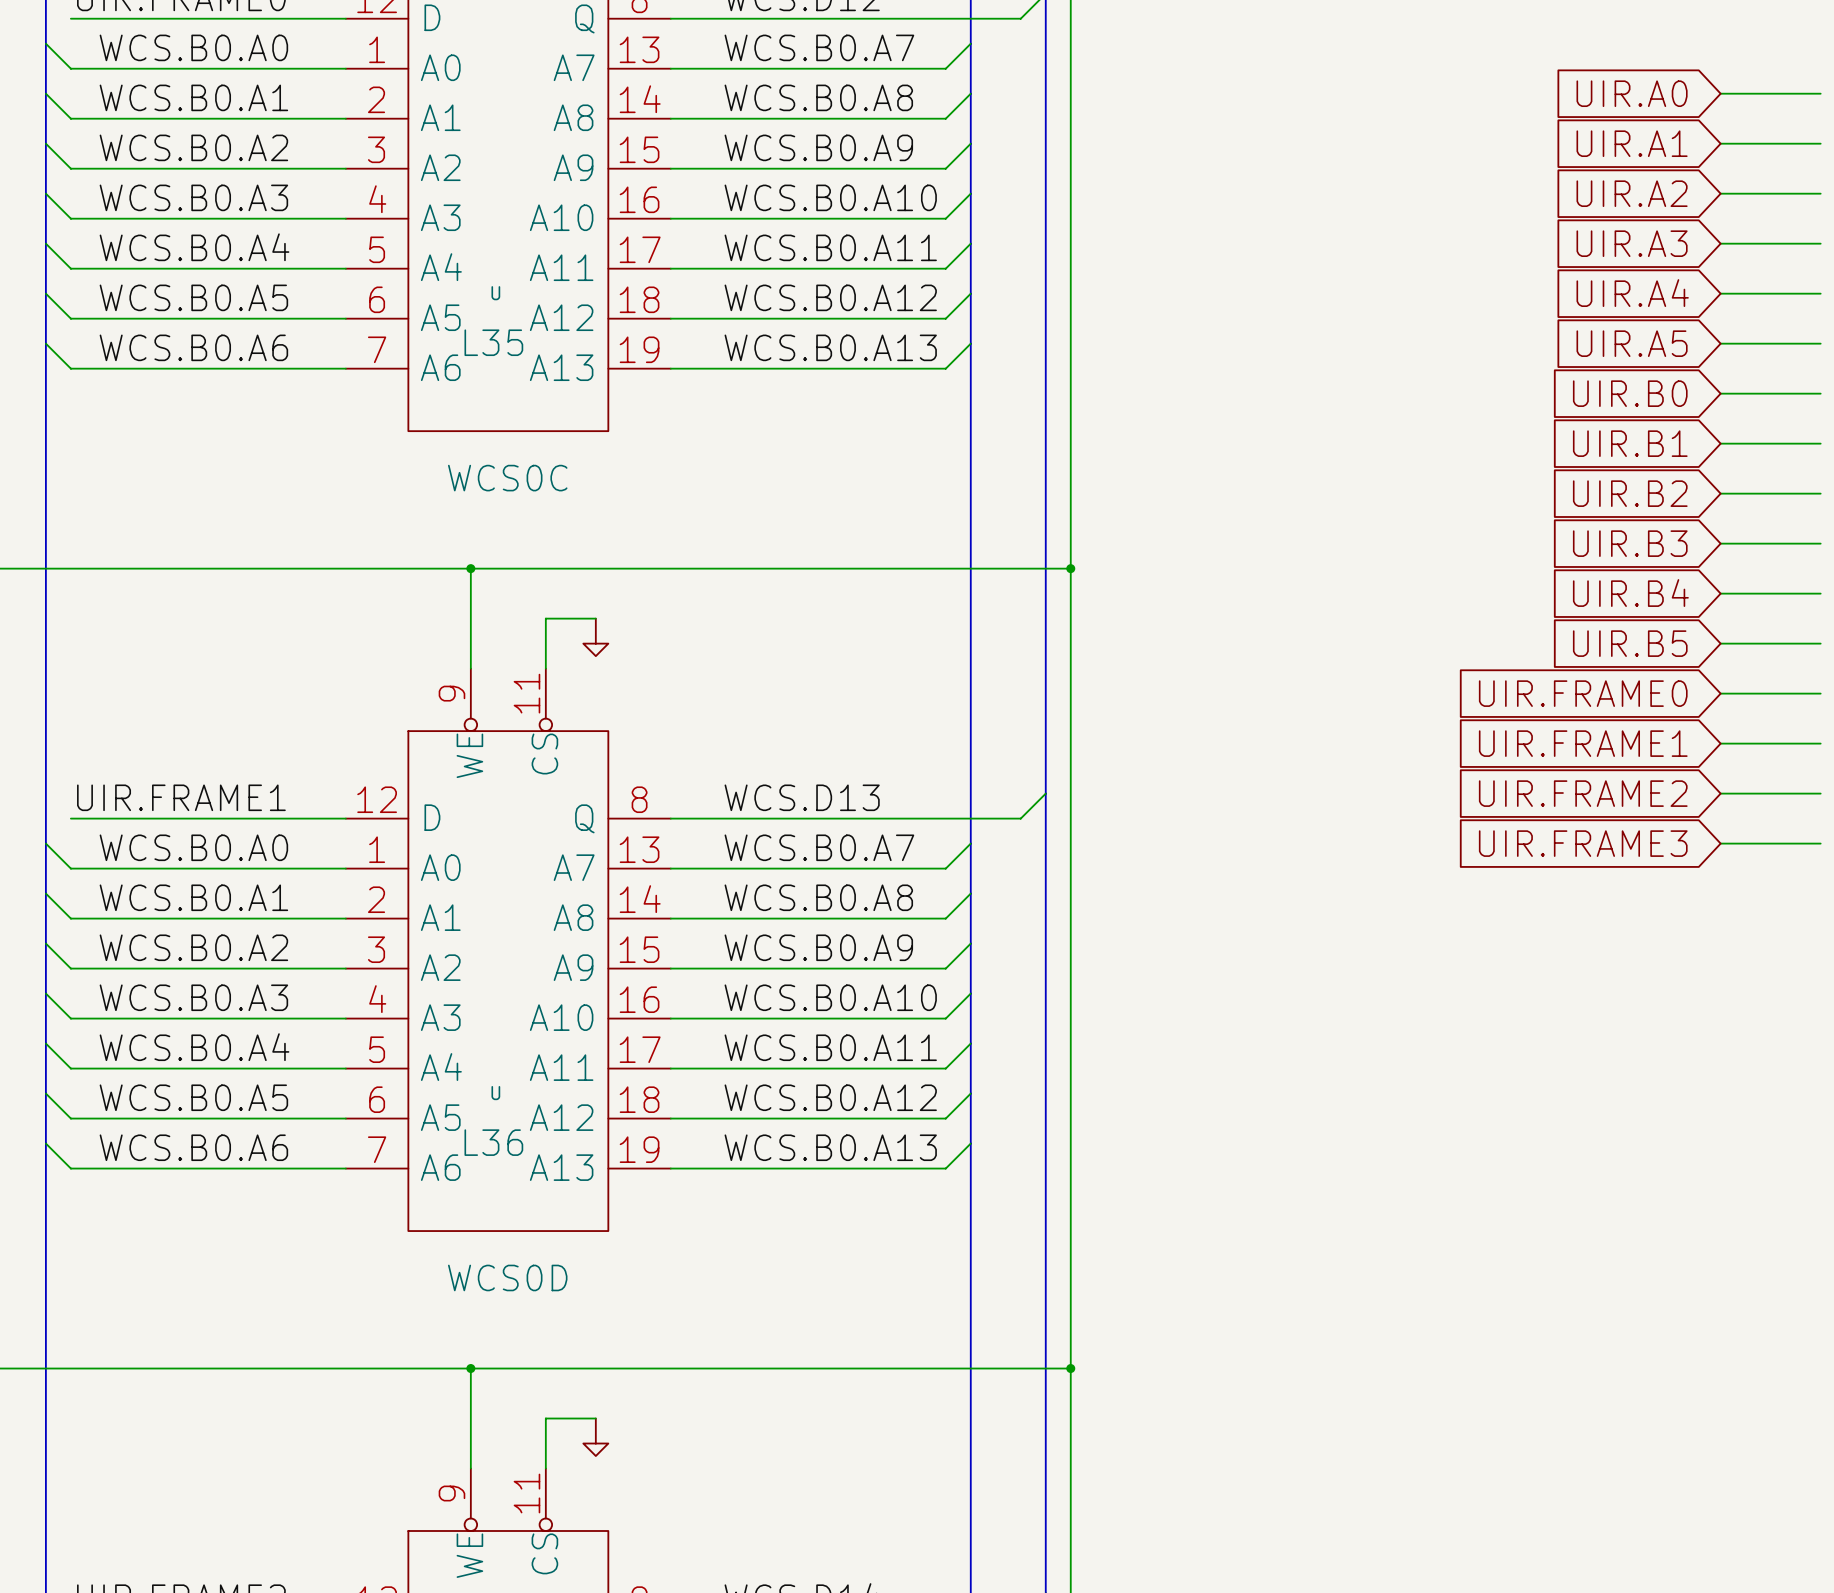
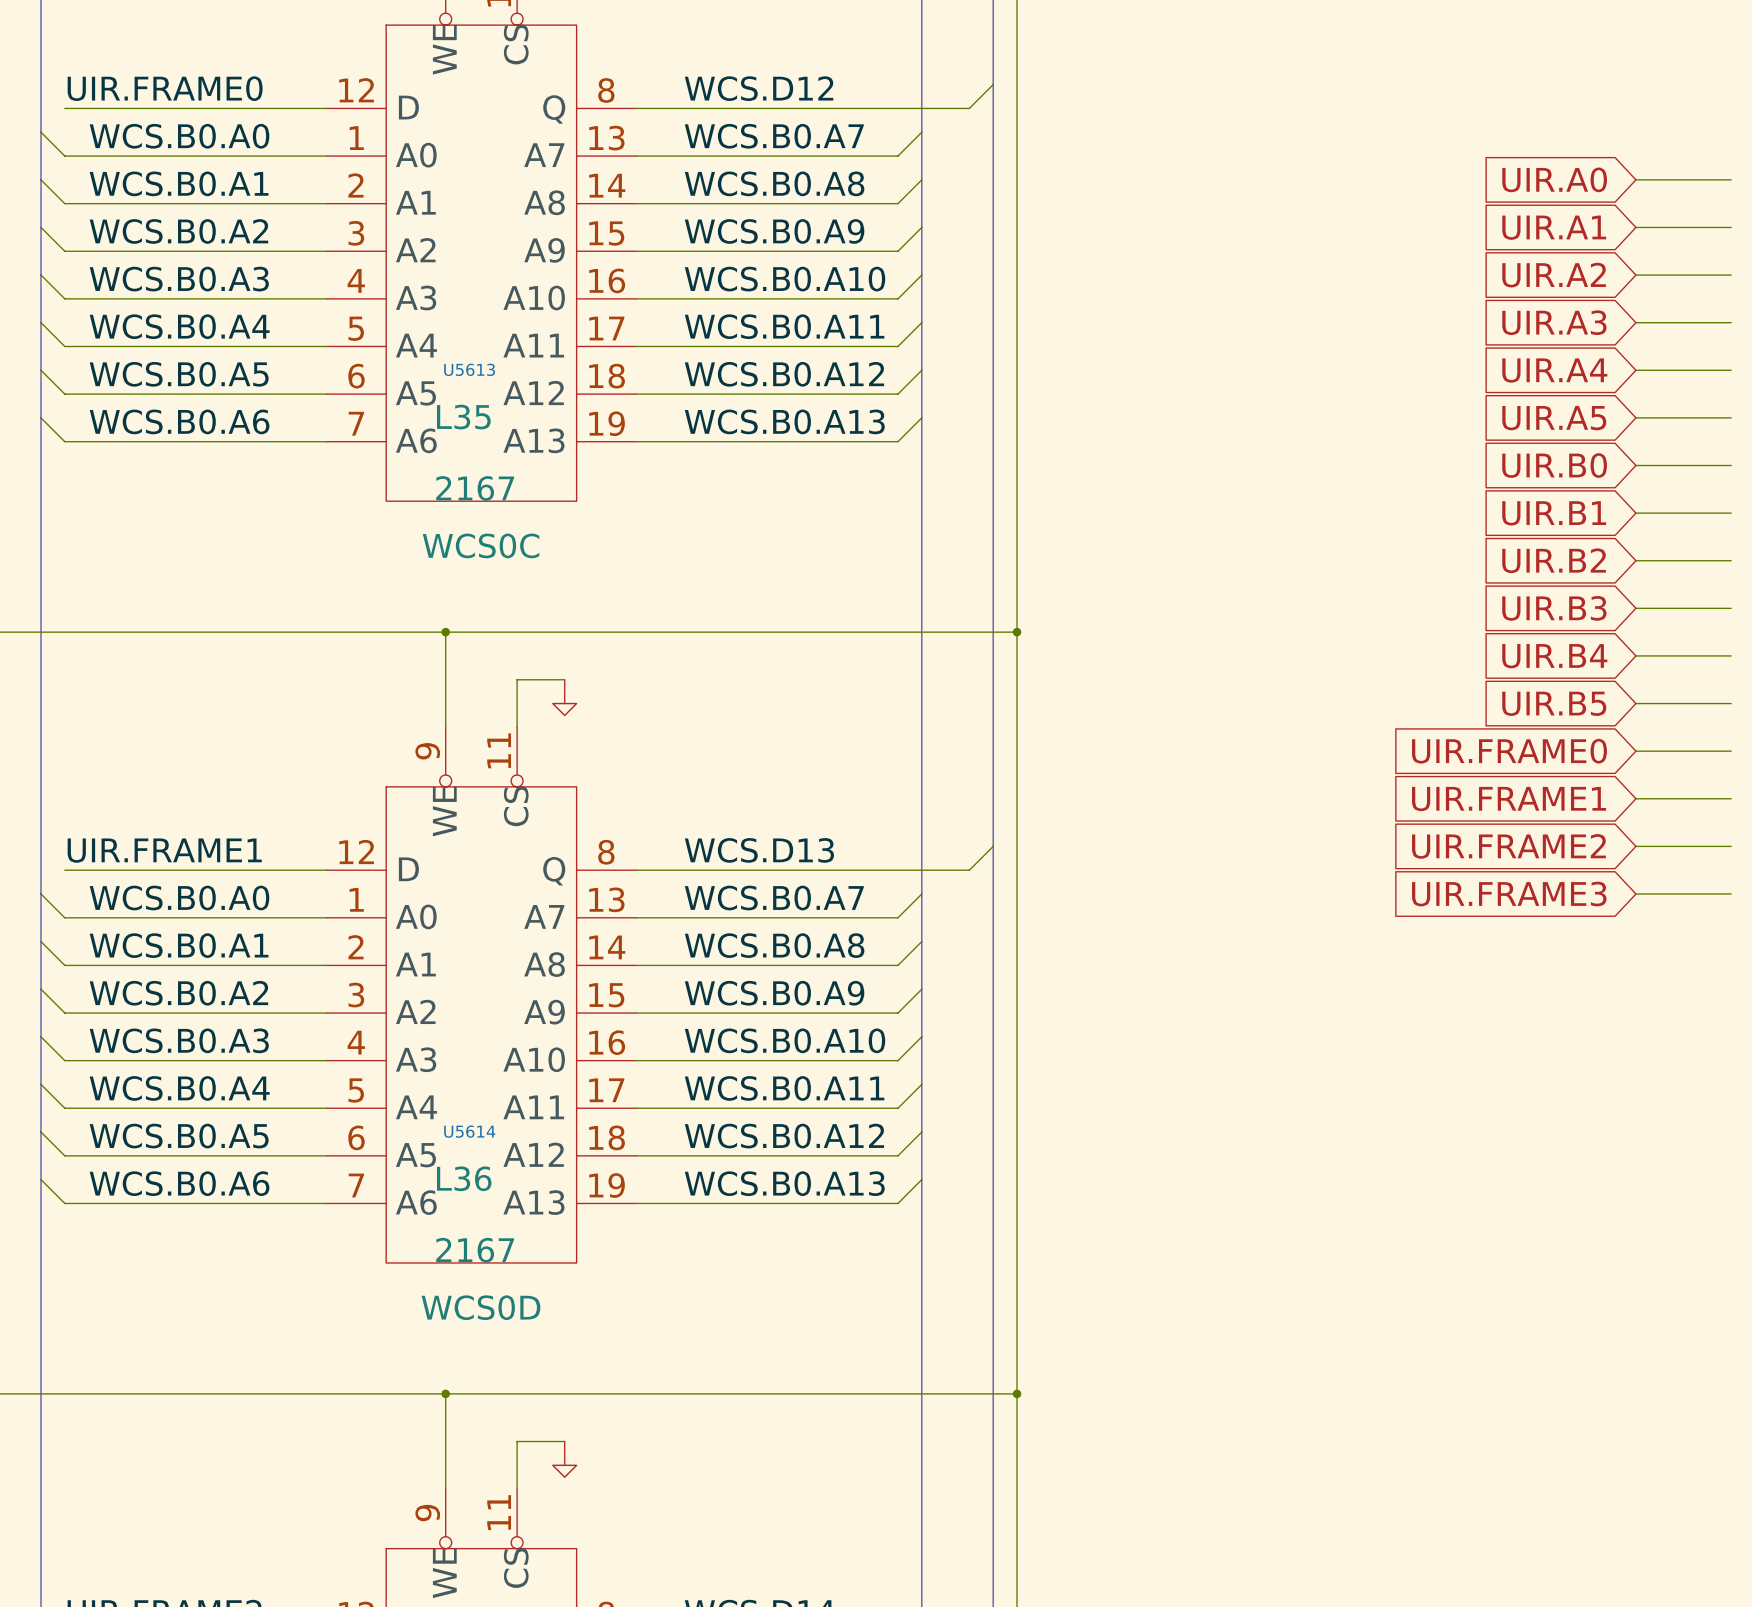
U name: U (495, 293) -> U5613 (469, 369)
U value: none -> 2167 (475, 488)
U name: U (495, 1093) -> U5614 (469, 1131)
U value: none -> 2167 (475, 1250)

